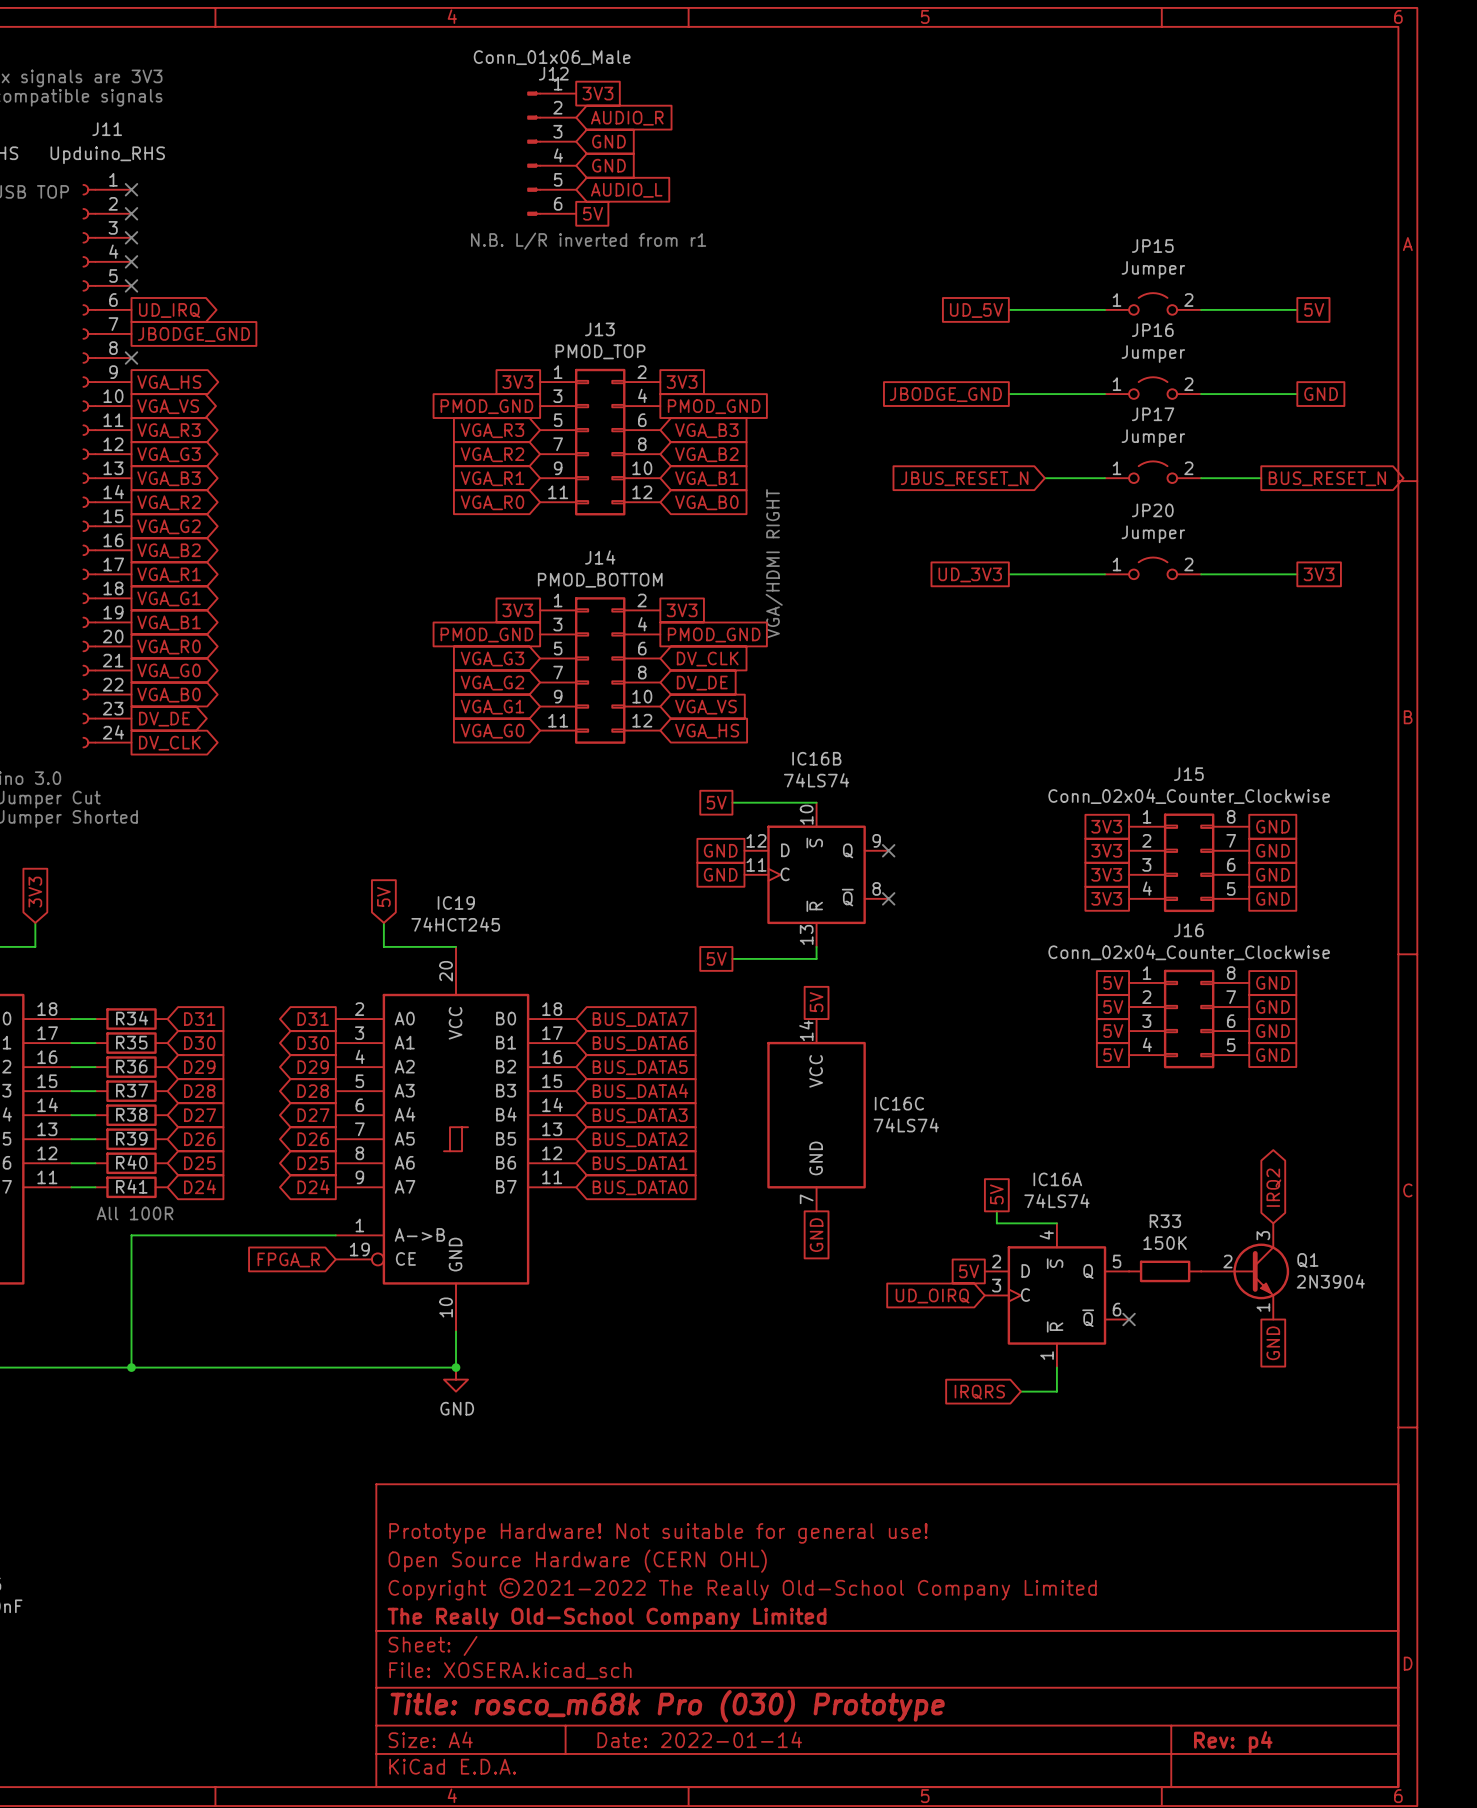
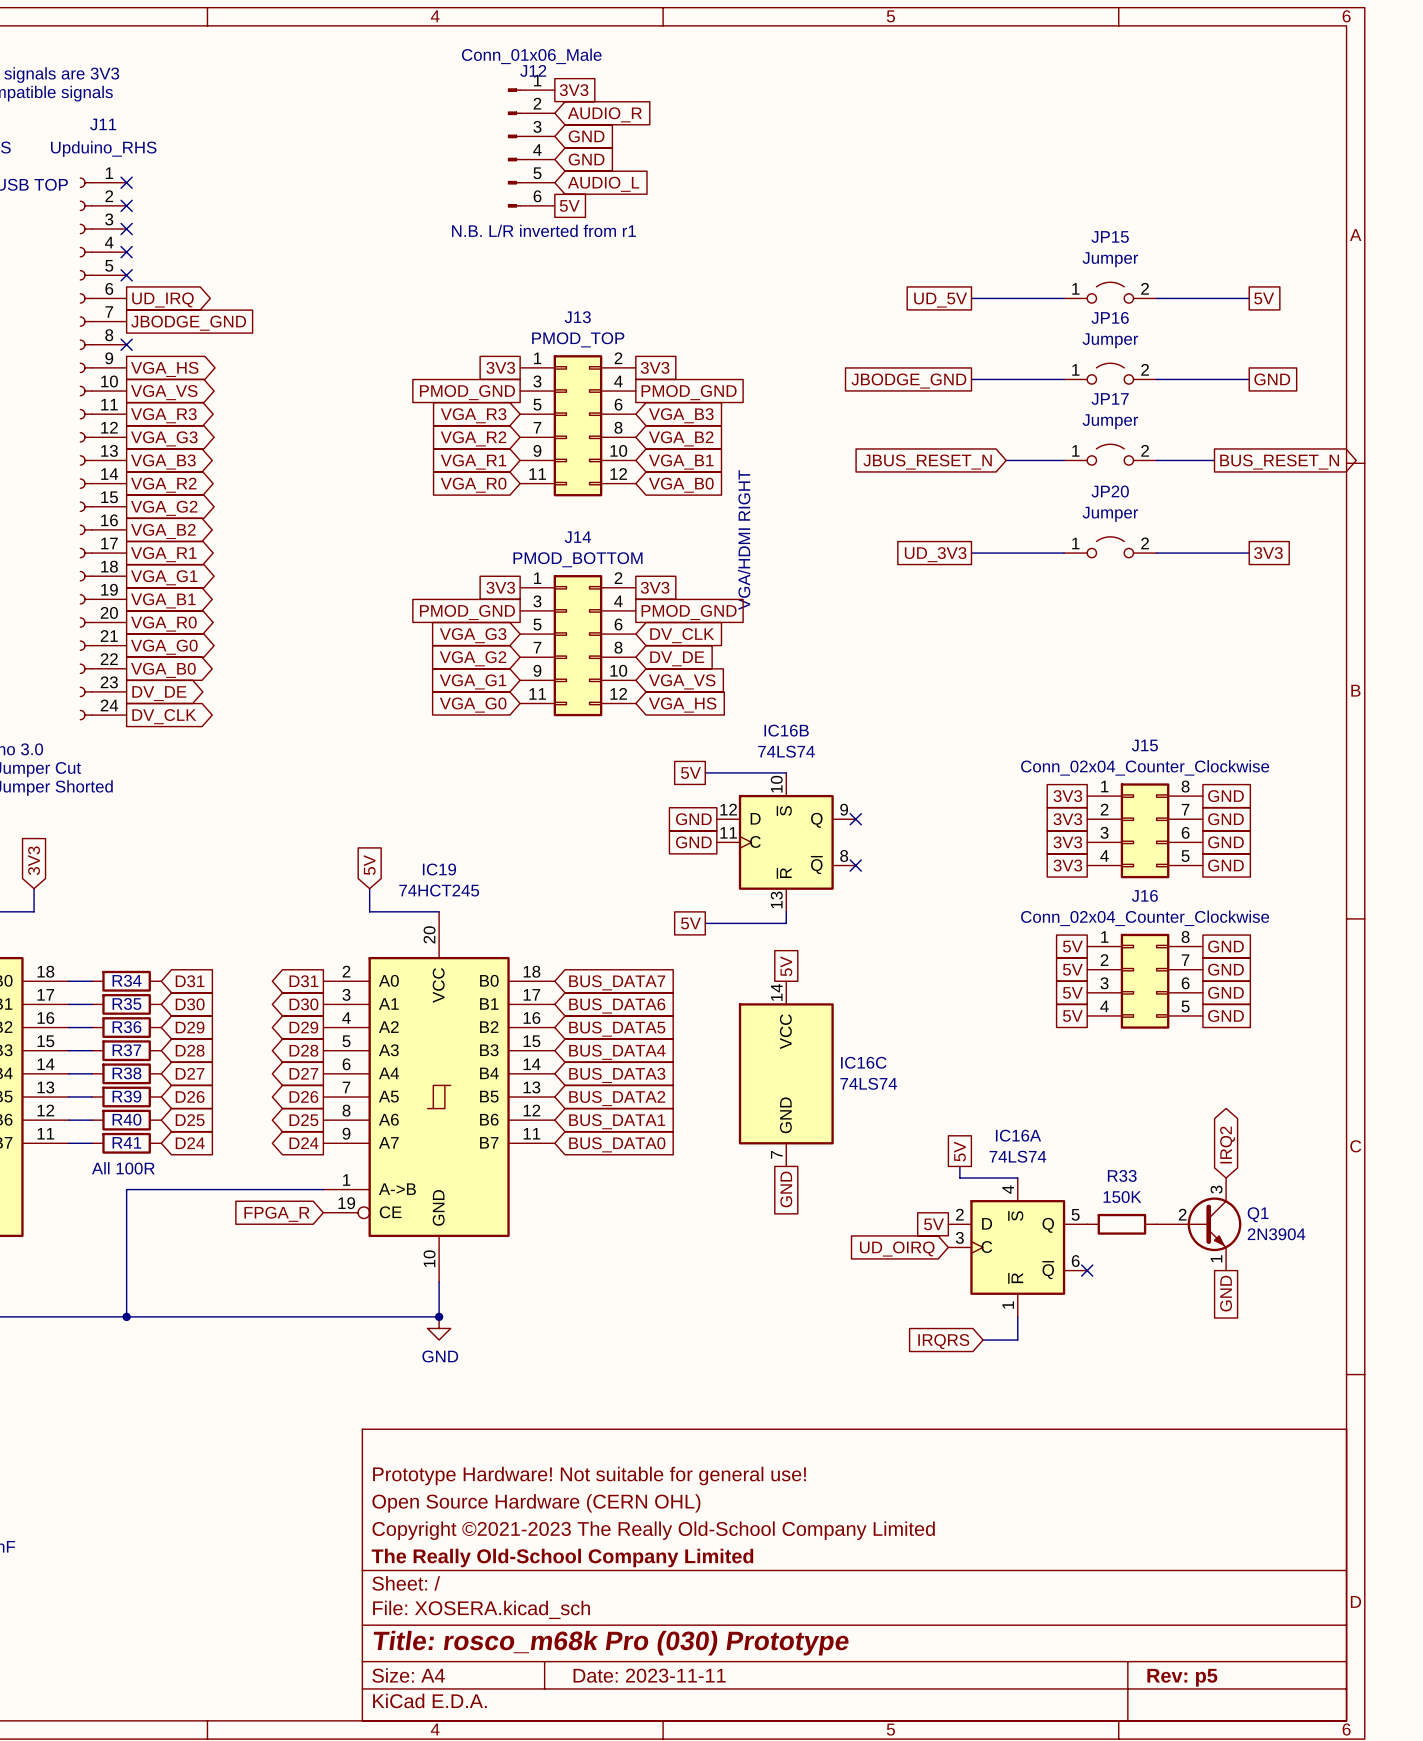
title block: Copyright ©2021-2022 The Really Old-School Company Limited (742, 1589) -> Copyright ©2021-2023 The Really Old-School Company Limited (653, 1530)
title block: Date: 2022-01-14 (699, 1739) -> Date: 2023-11-11 (649, 1675)
title block: Rev: p4 (1233, 1742) -> Rev: p5 (1182, 1677)

